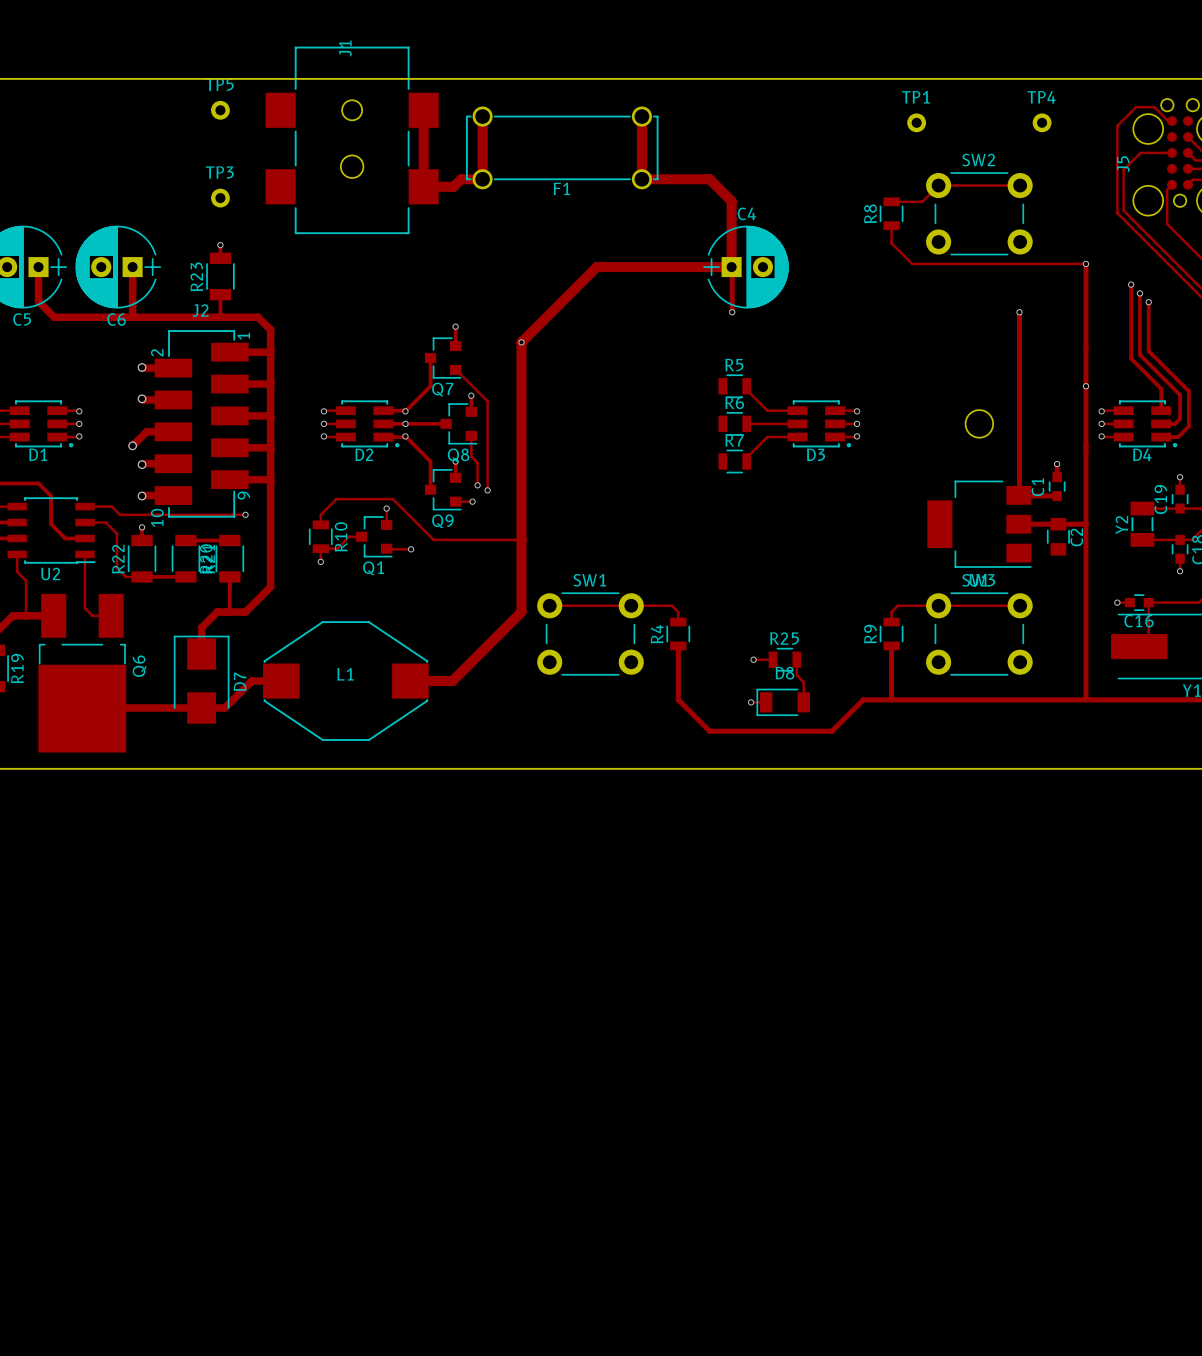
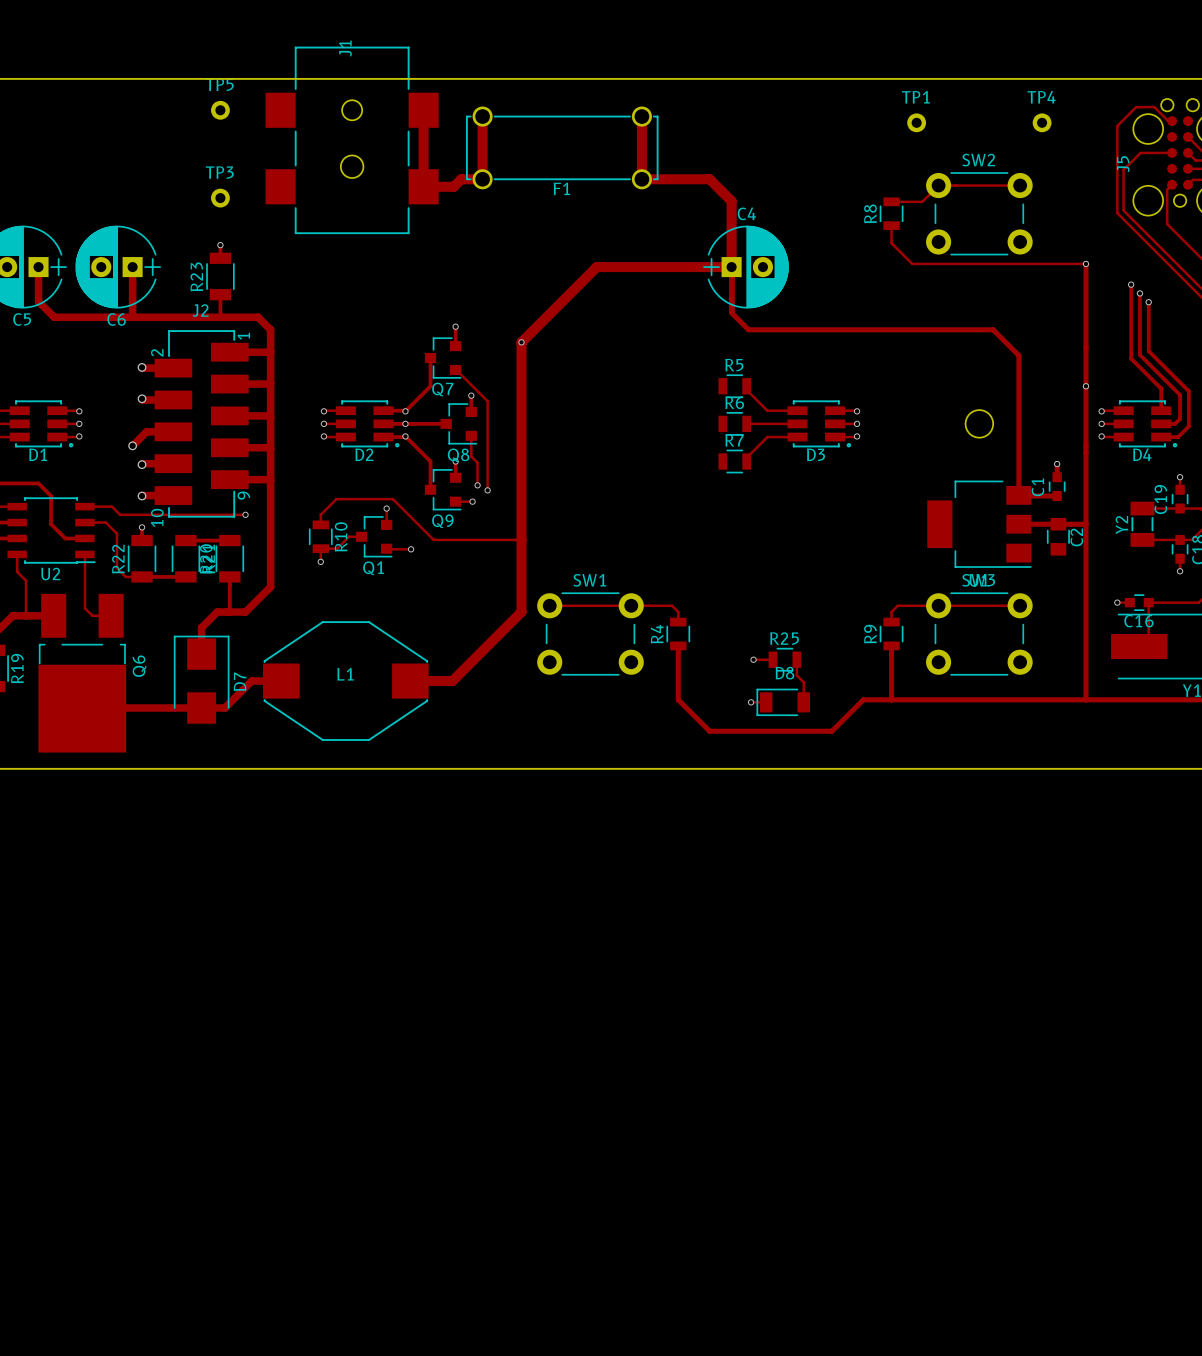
via: (732, 312) -> none
track: (1019, 312) (1018, 495) -> (731, 267) (731, 312) (748, 329) (993, 329) (1018, 355) (1018, 495)
via: (1019, 312) -> none

